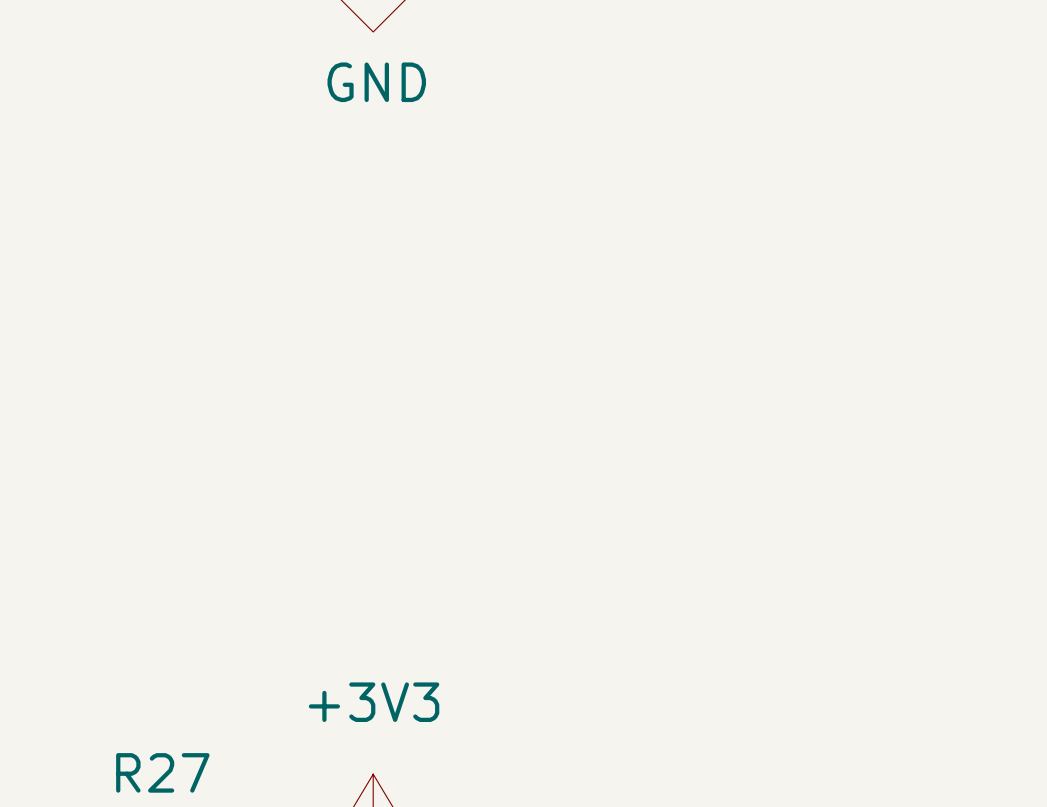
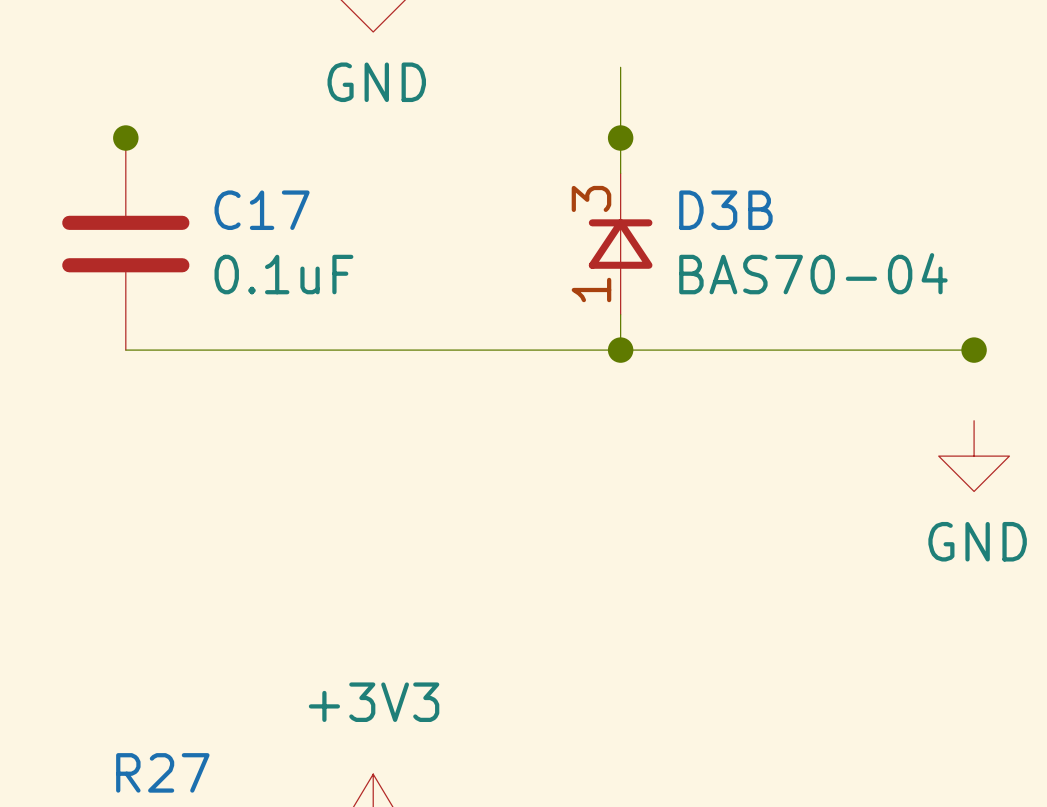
wire: none -> (620, 67) (620, 173)
junction: none -> (125, 138)
junction: none -> (620, 138)
C17: none -> 0.1uF (125, 244)
D3B: none -> BAS70-04 (620, 244)
wire: none -> (620, 314) (620, 350)
wire: none -> (125, 350) (974, 350)
junction: none -> (620, 350)
junction: none -> (974, 350)
power symbol: none -> GND (974, 456)

